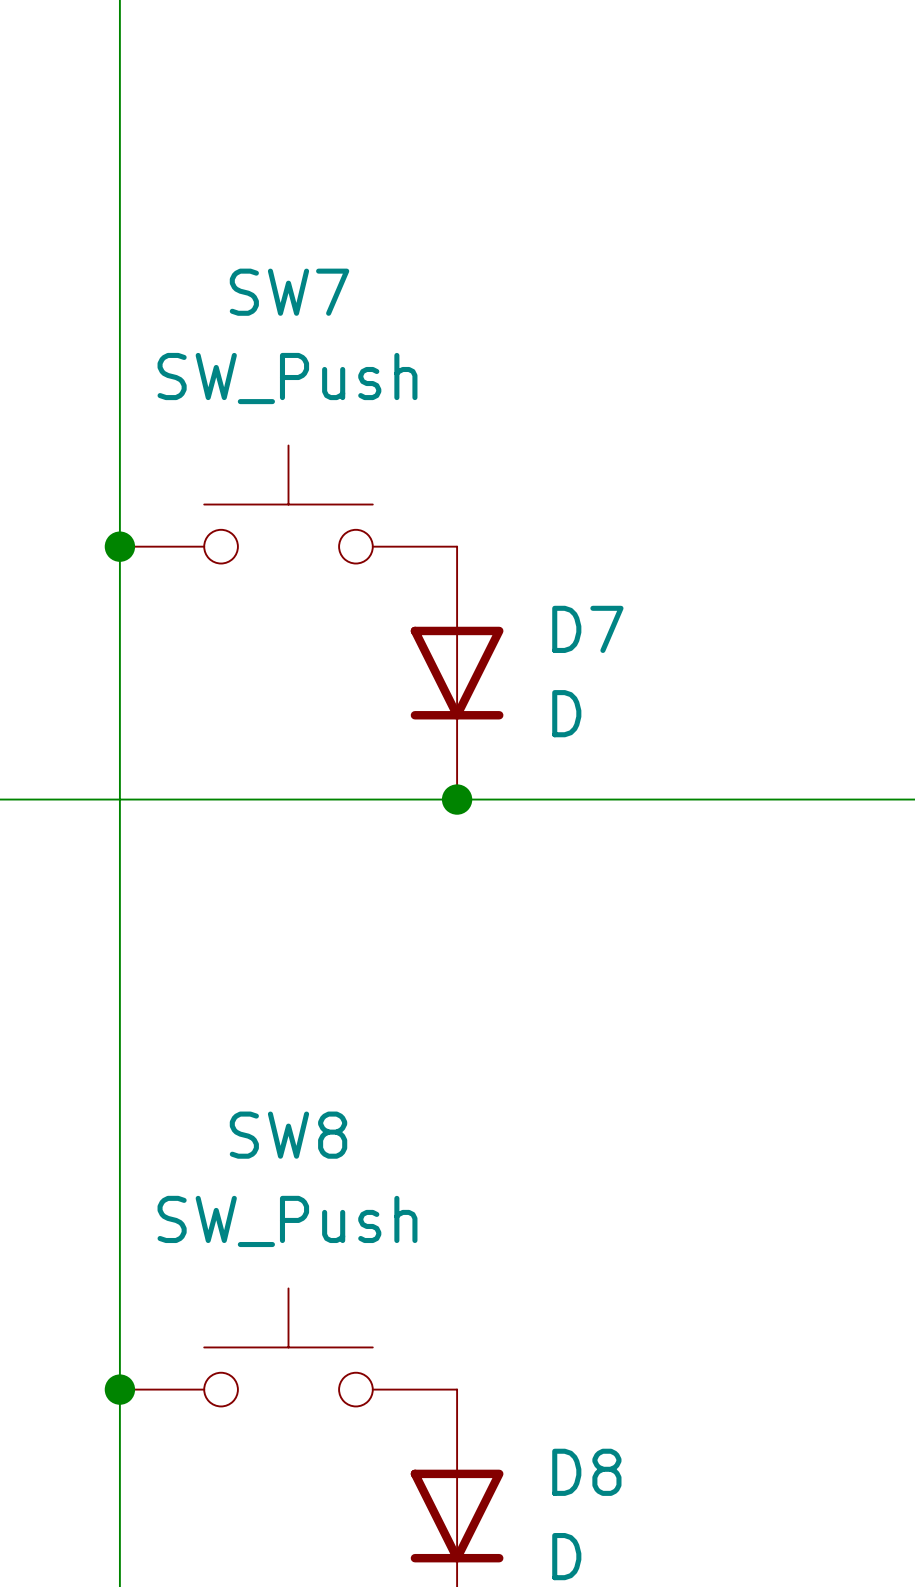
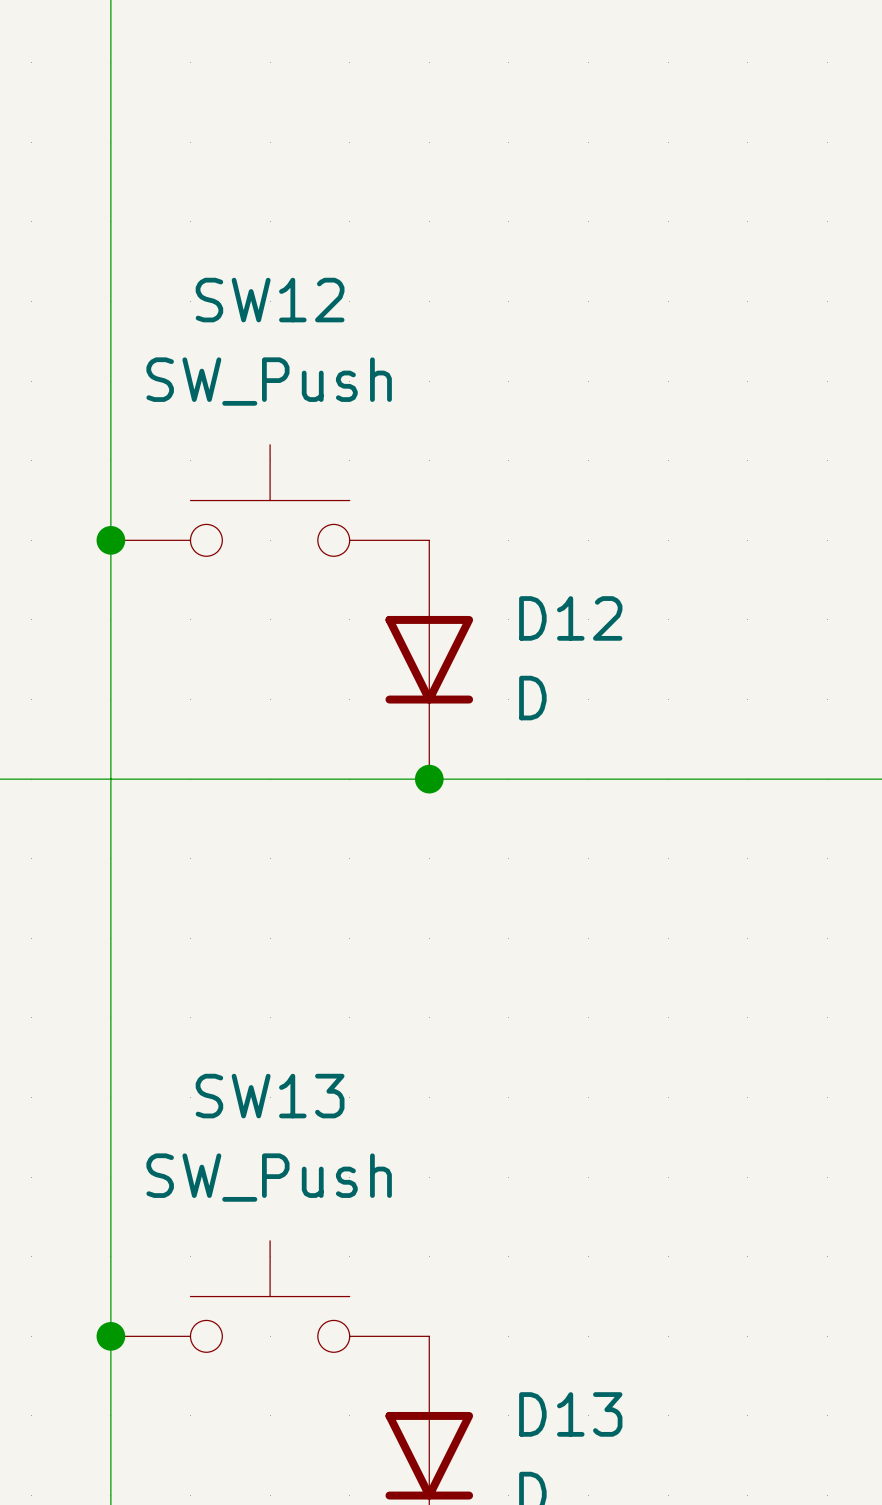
SW7 name: SW7 (289, 292) -> SW12 (270, 300)
D7 name: D7 (587, 629) -> D12 (570, 618)
SW8 name: SW8 (288, 1135) -> SW13 (270, 1096)
D8 name: D8 (586, 1472) -> D13 (570, 1414)

